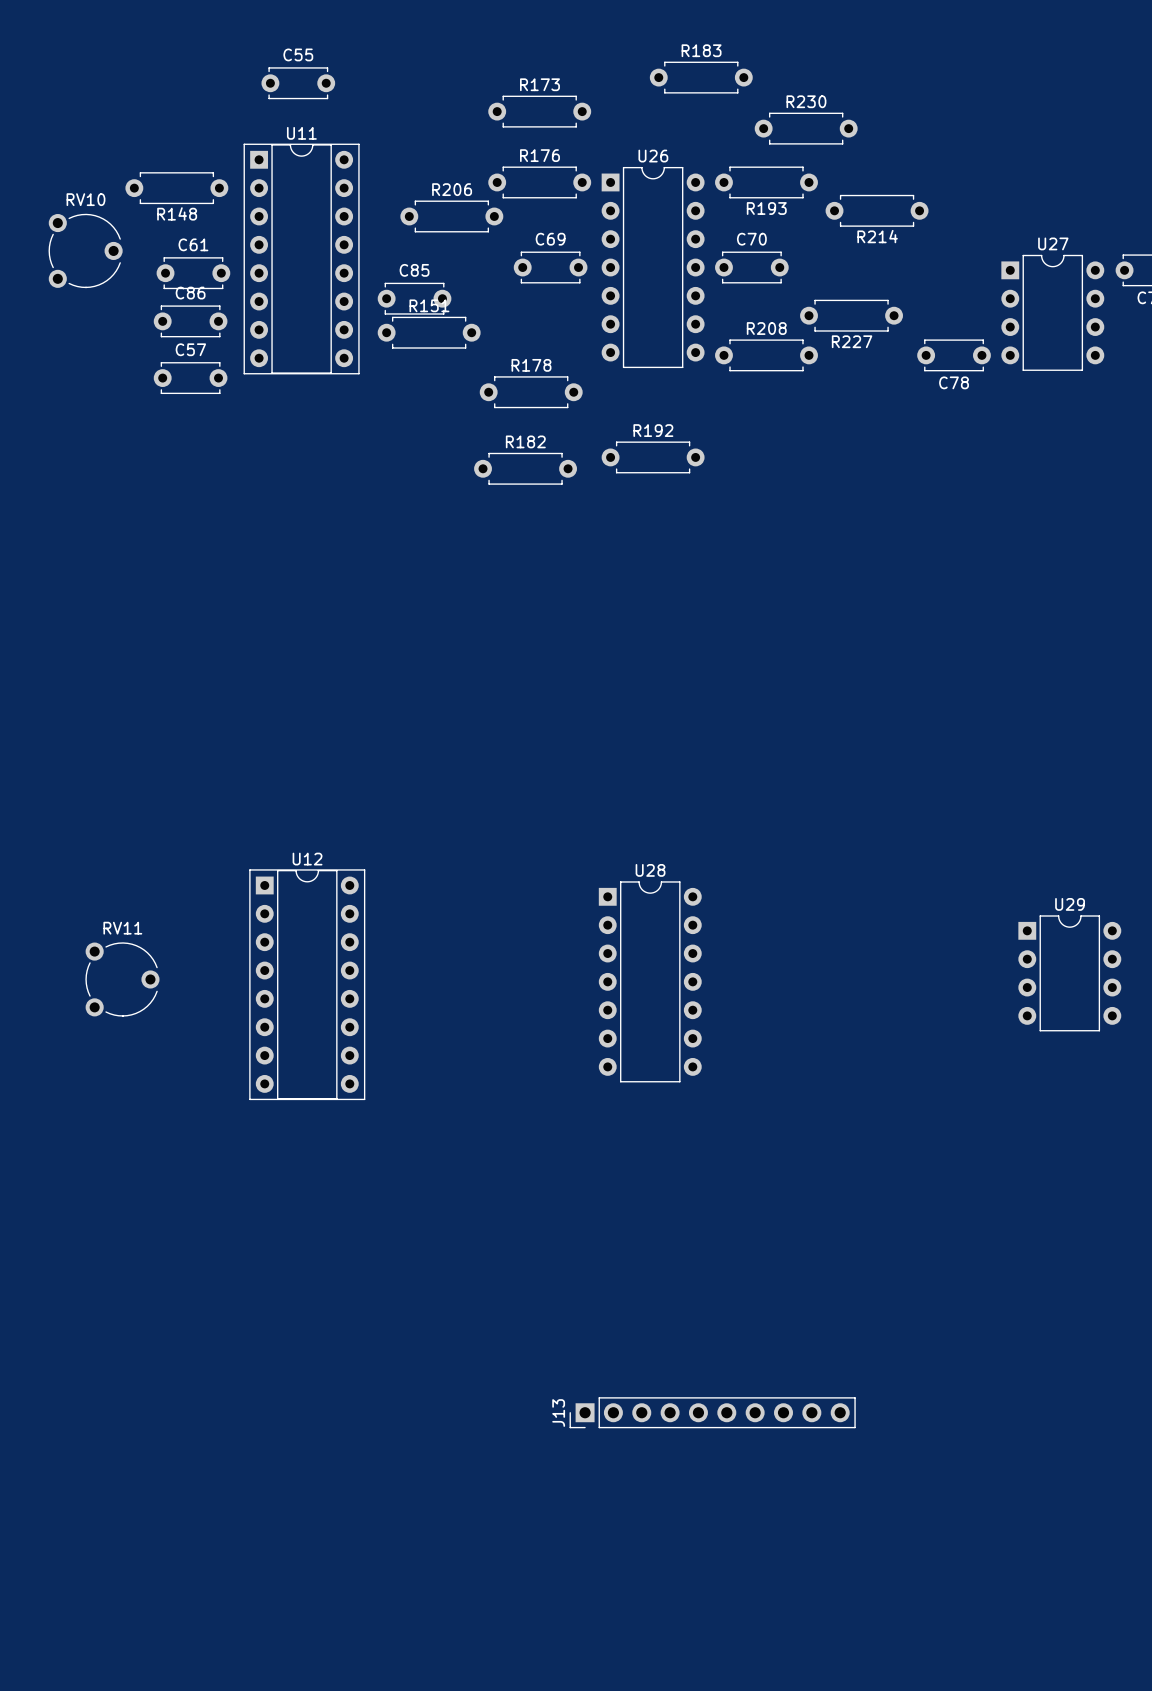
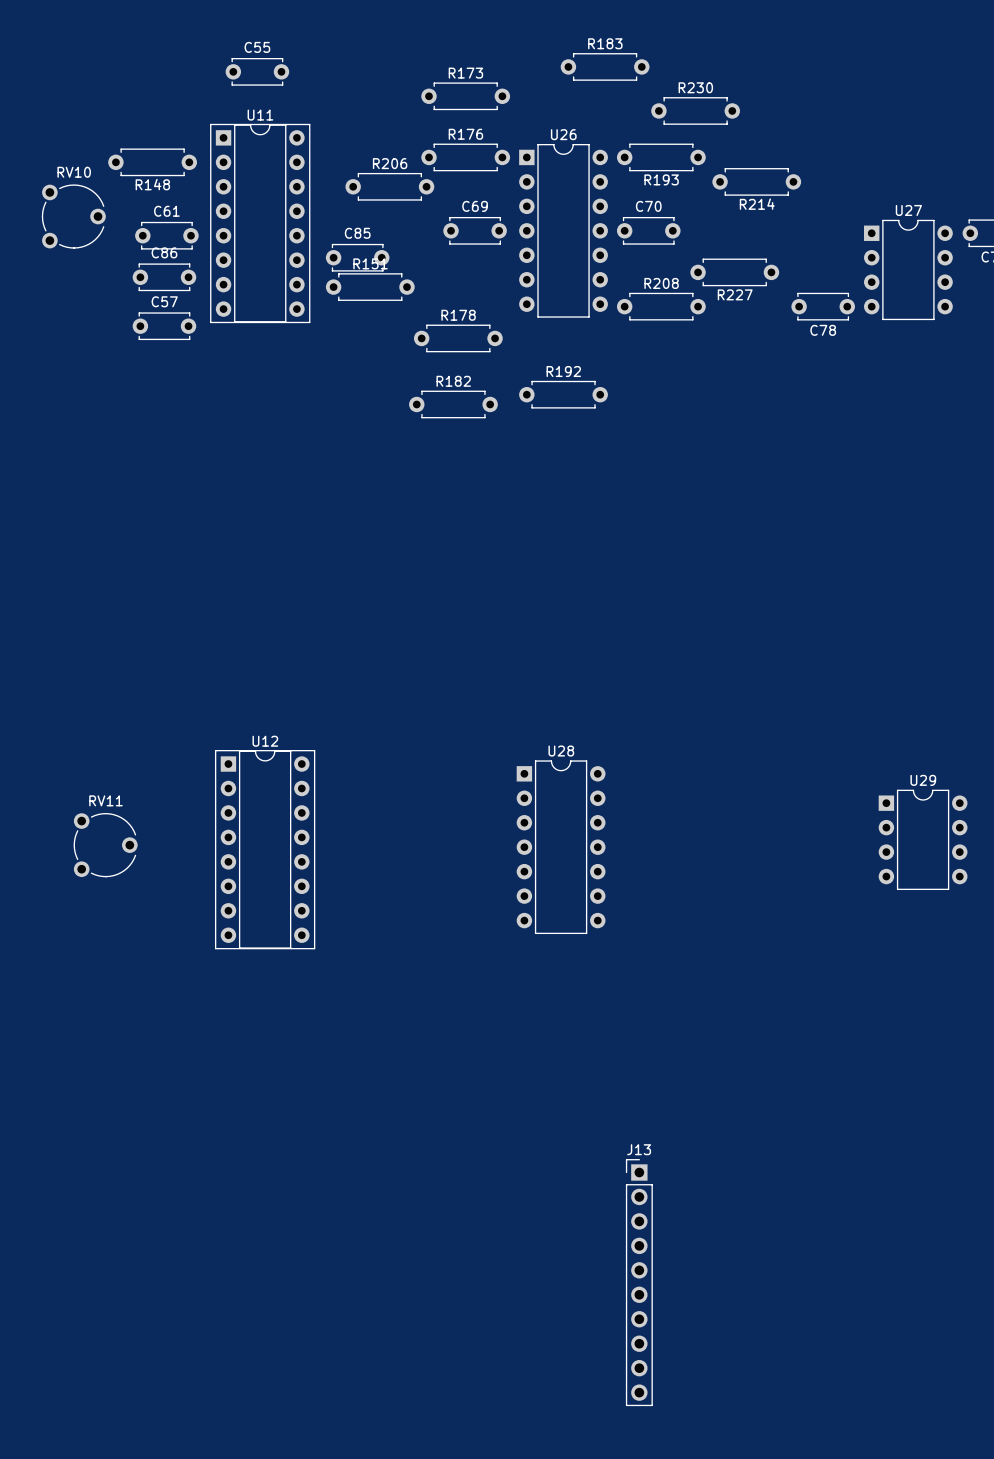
J13 rotation: 0° (712, 1412) -> 90° clockwise (639, 1282)

